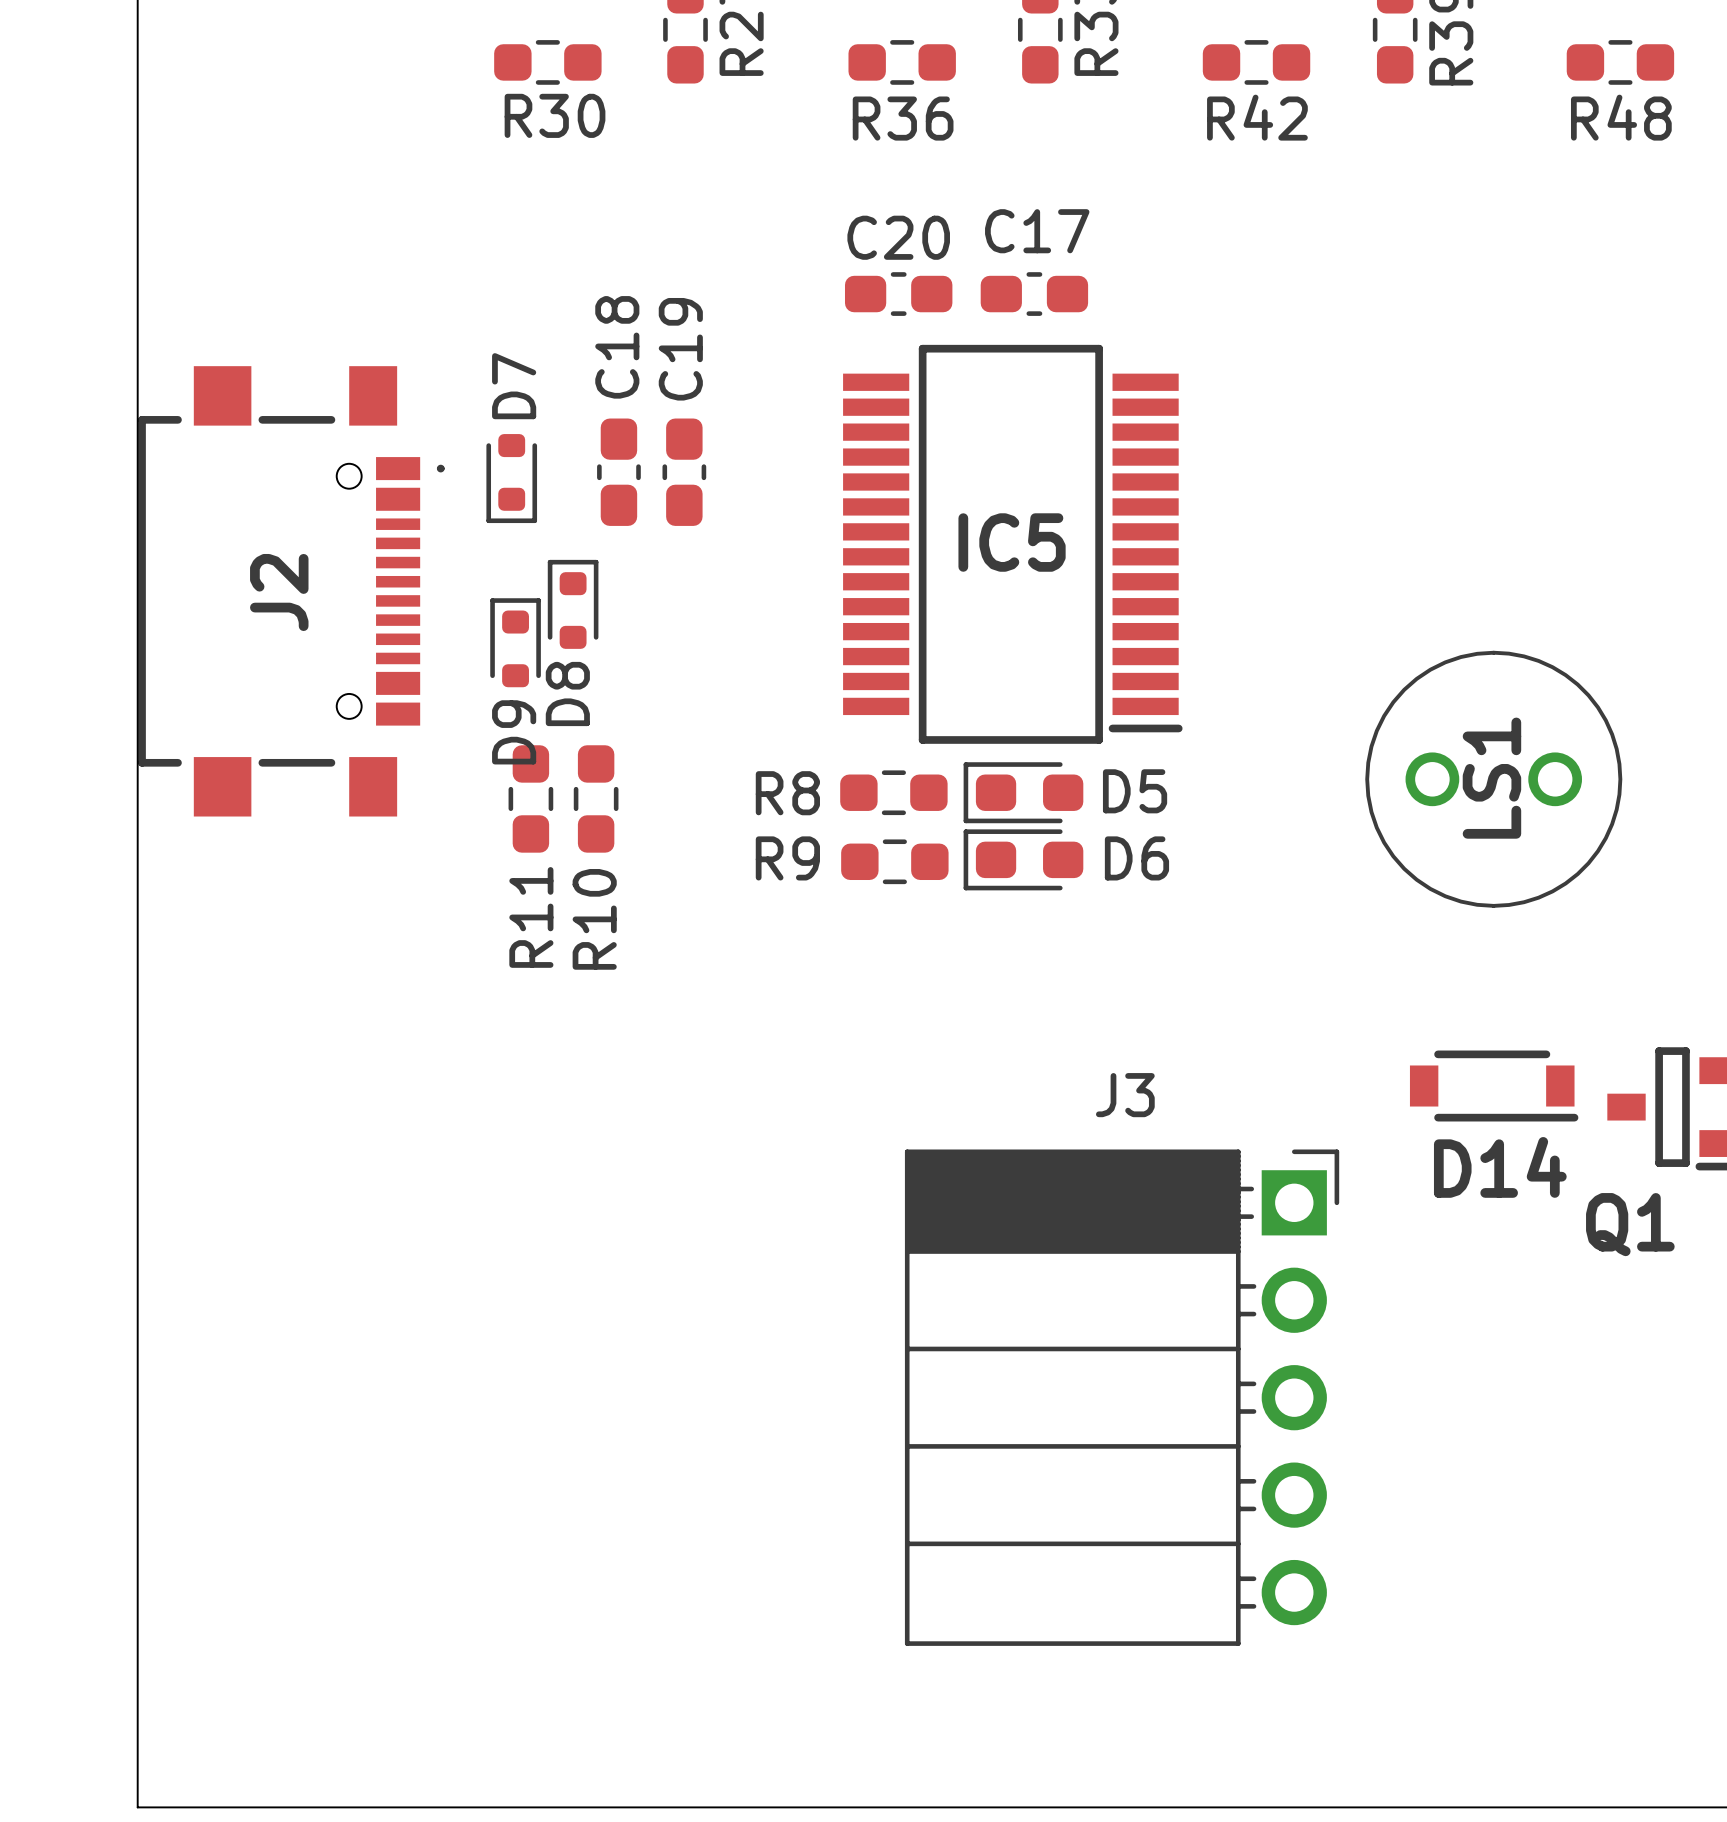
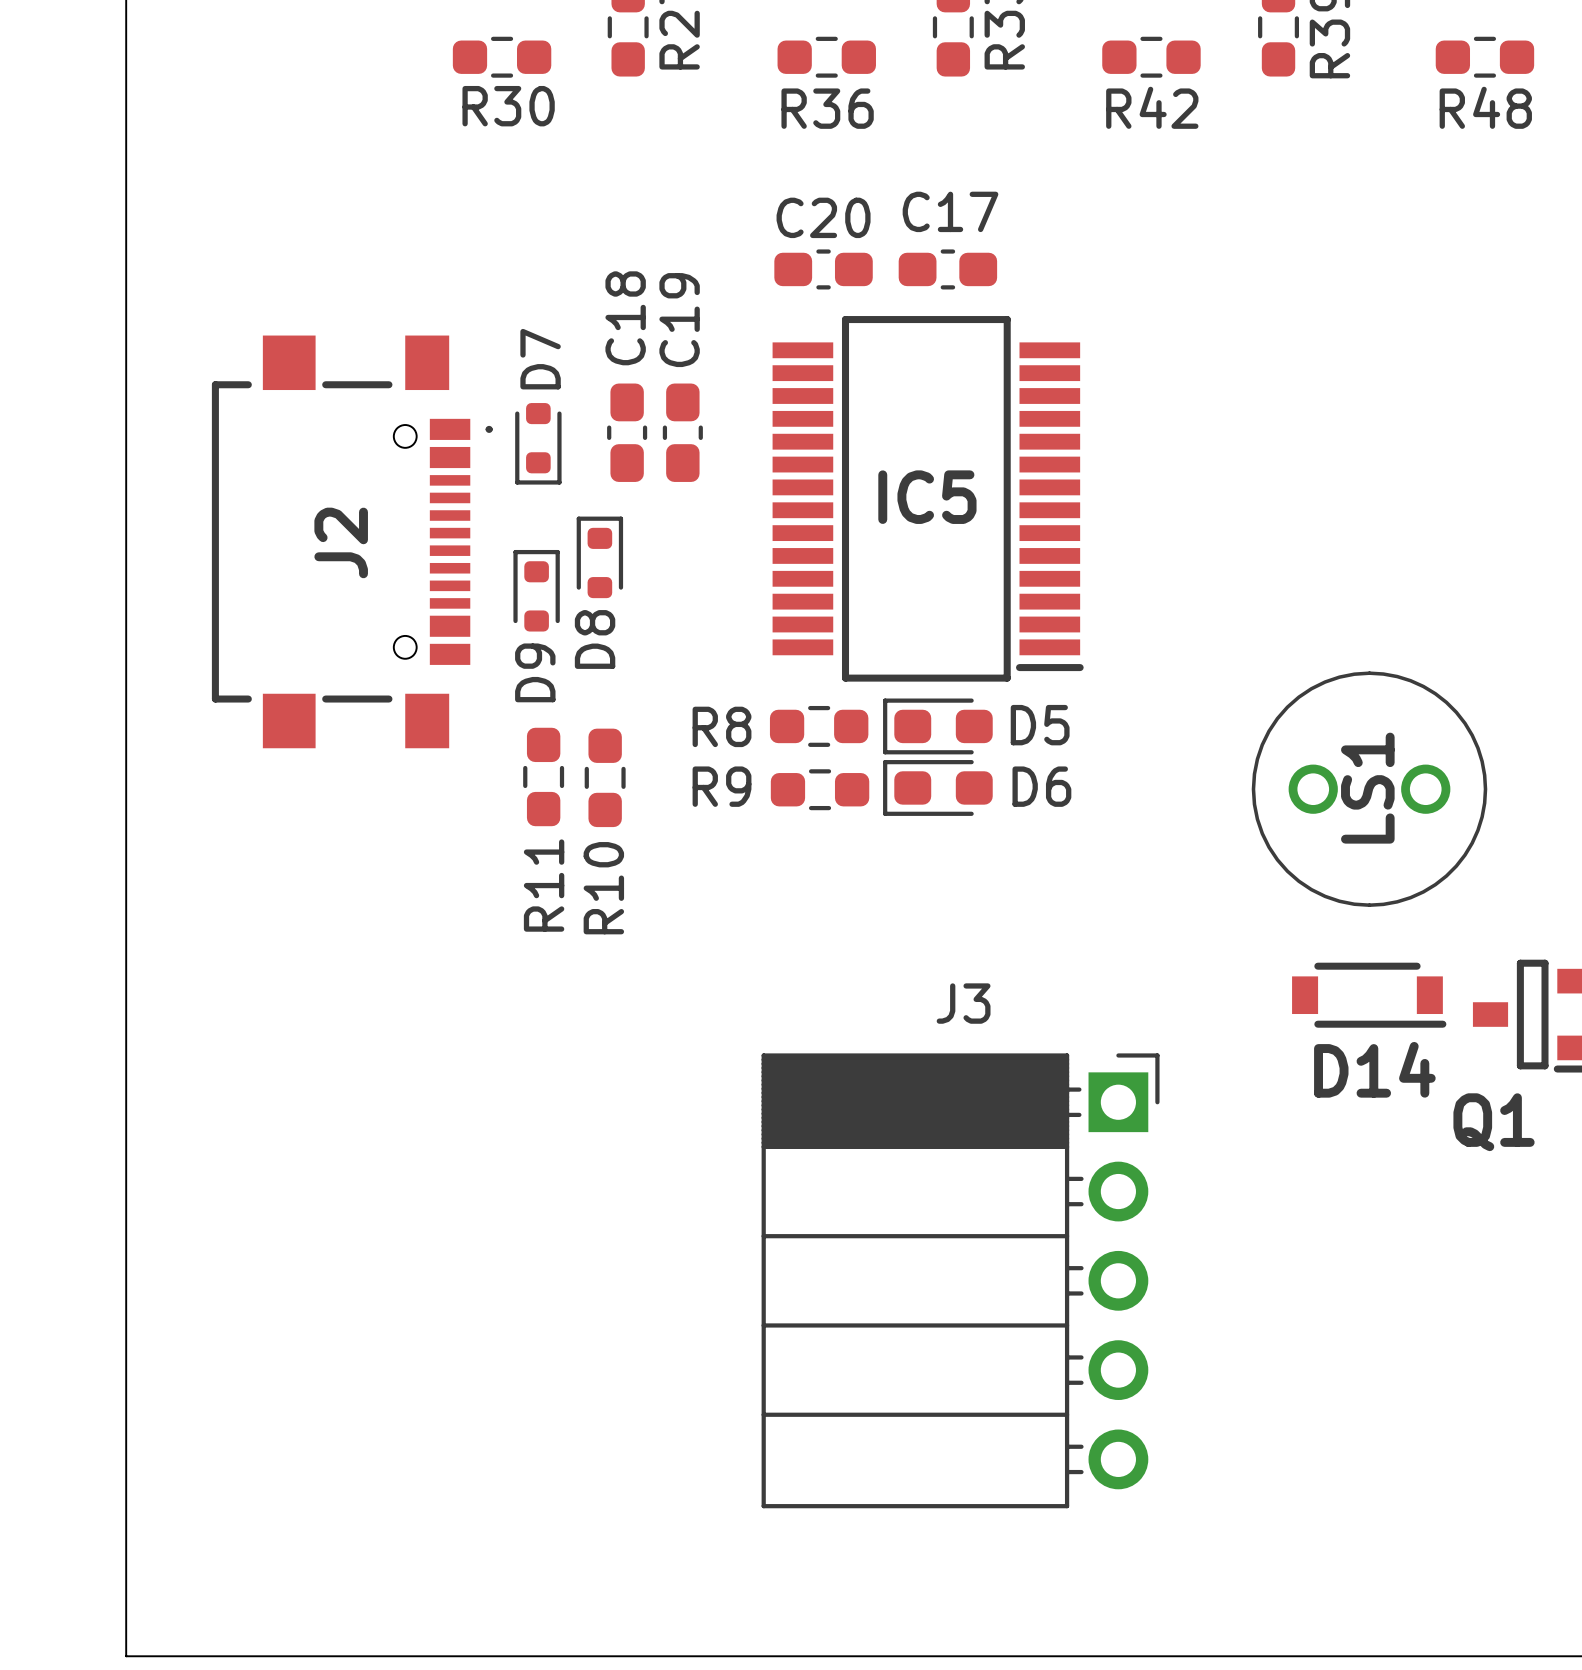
C19 name: C19 (680, 349) -> C18 (625, 318)
C18: (618, 472) -> none
C19: none -> (682, 432)
D7 position: (511, 478) -> (538, 443)
J2 position: (291, 591) -> (352, 541)
D8 position: (573, 604) -> (599, 557)
D9 position: (515, 642) -> (536, 590)
LS1 position: (1493, 779) -> (1369, 789)
R11 position: (530, 798) -> (543, 776)
R10 position: (596, 798) -> (605, 777)
J3 position: (1122, 1397) -> (960, 1280)

